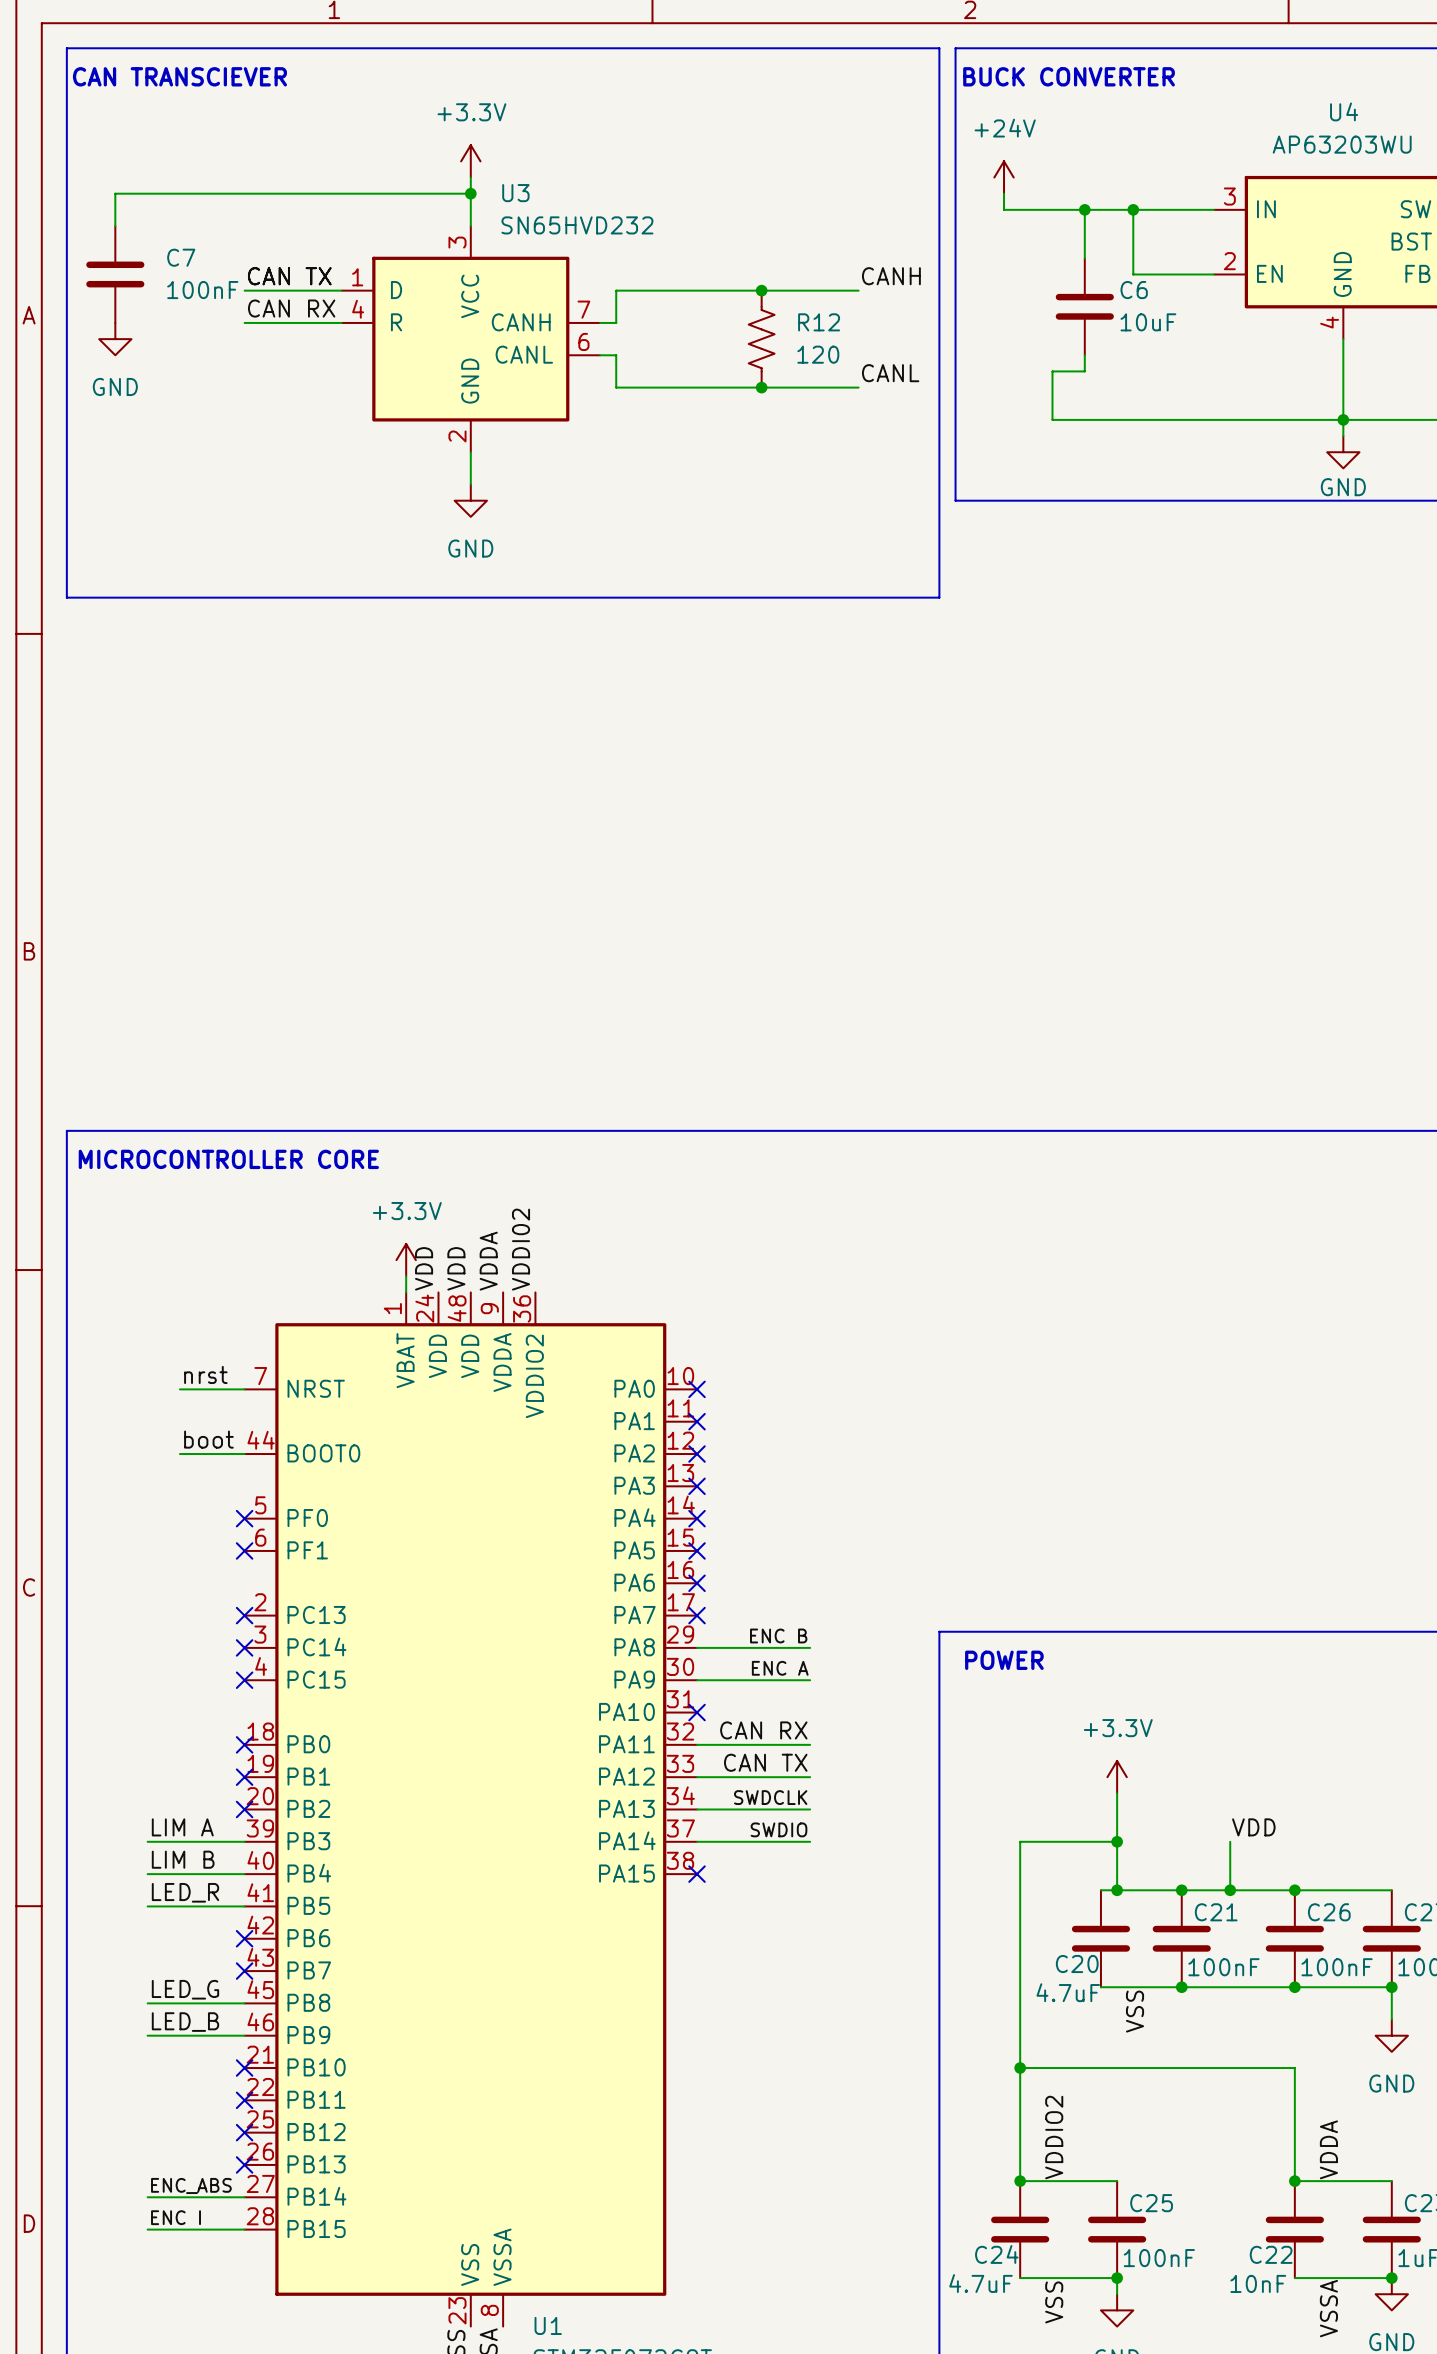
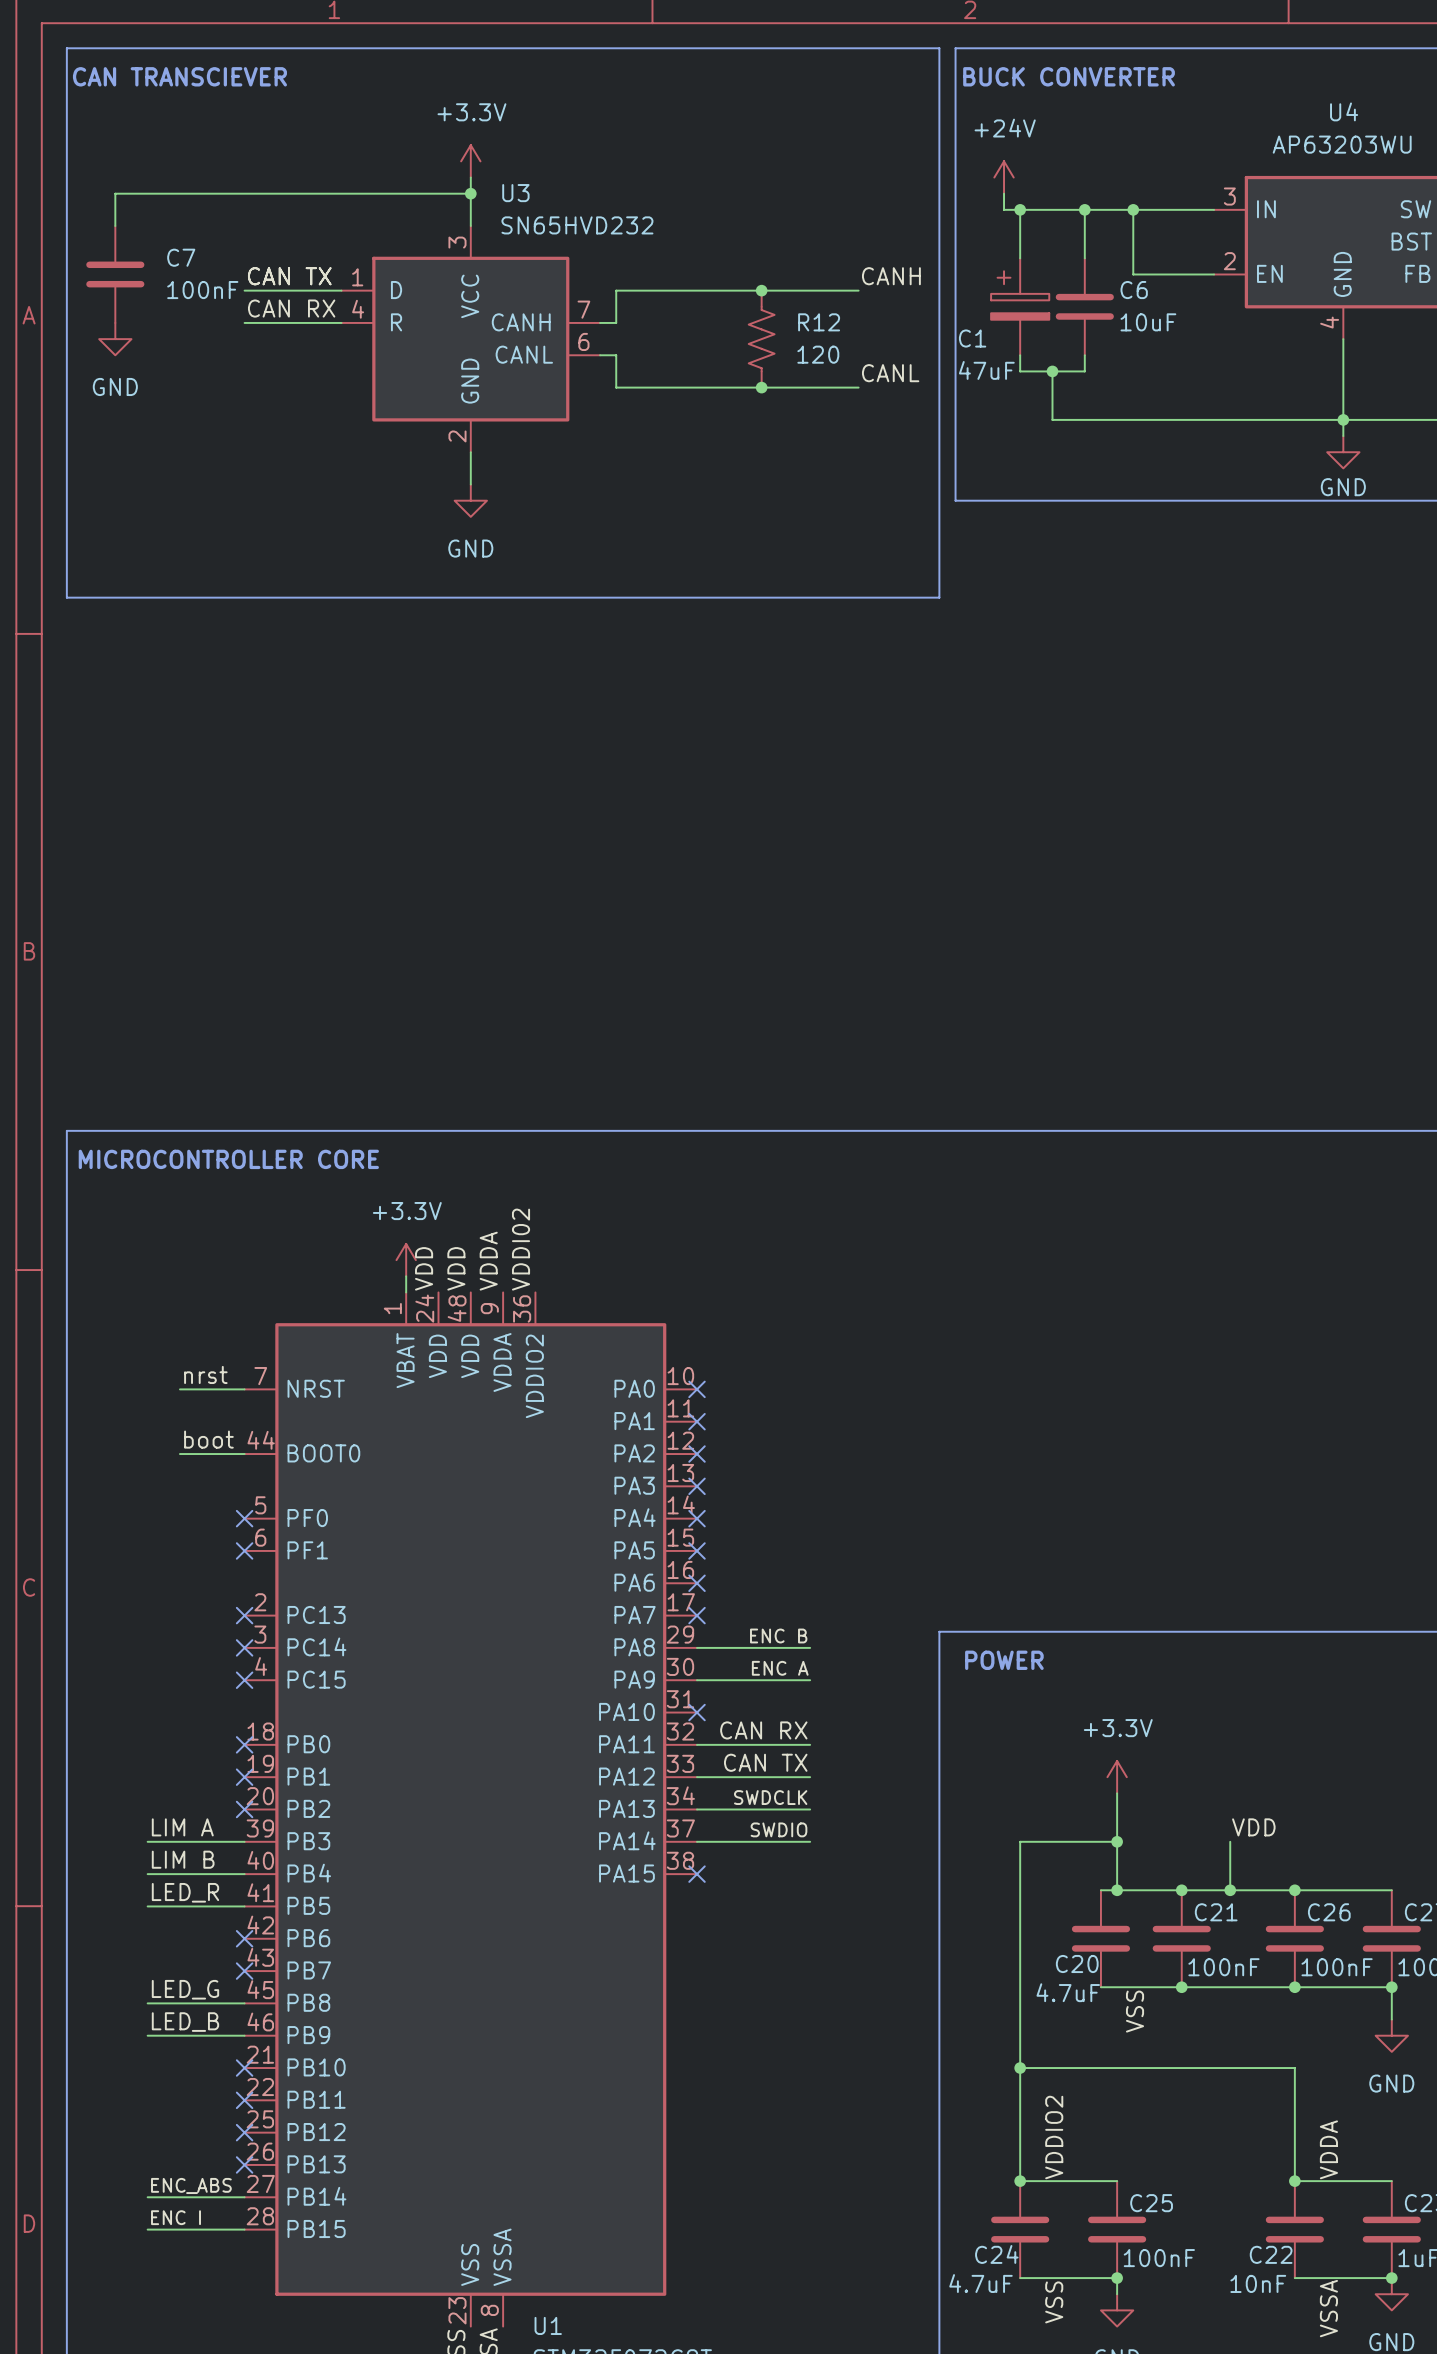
wire: none -> (1020, 209) (1020, 258)
junction: none -> (1020, 209)
C1: none -> 47uF (1020, 306)
wire: none -> (1020, 355) (1020, 371) (1052, 371)
junction: none -> (1052, 371)

